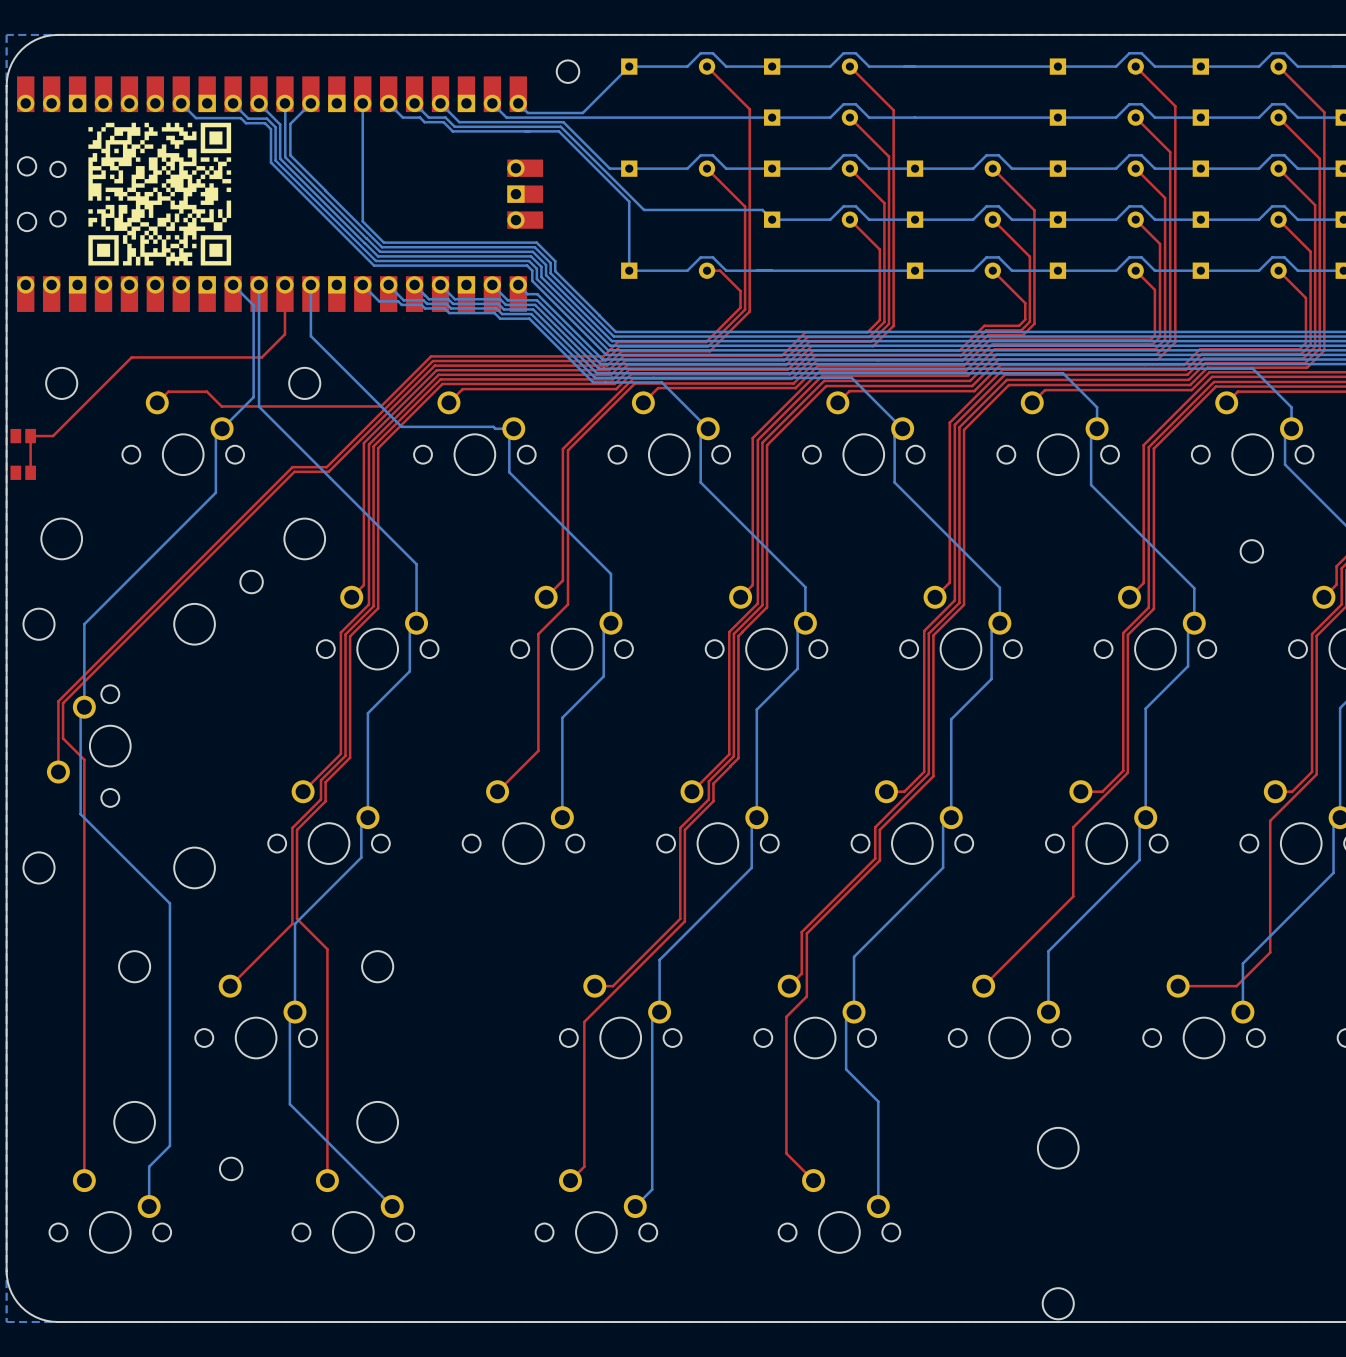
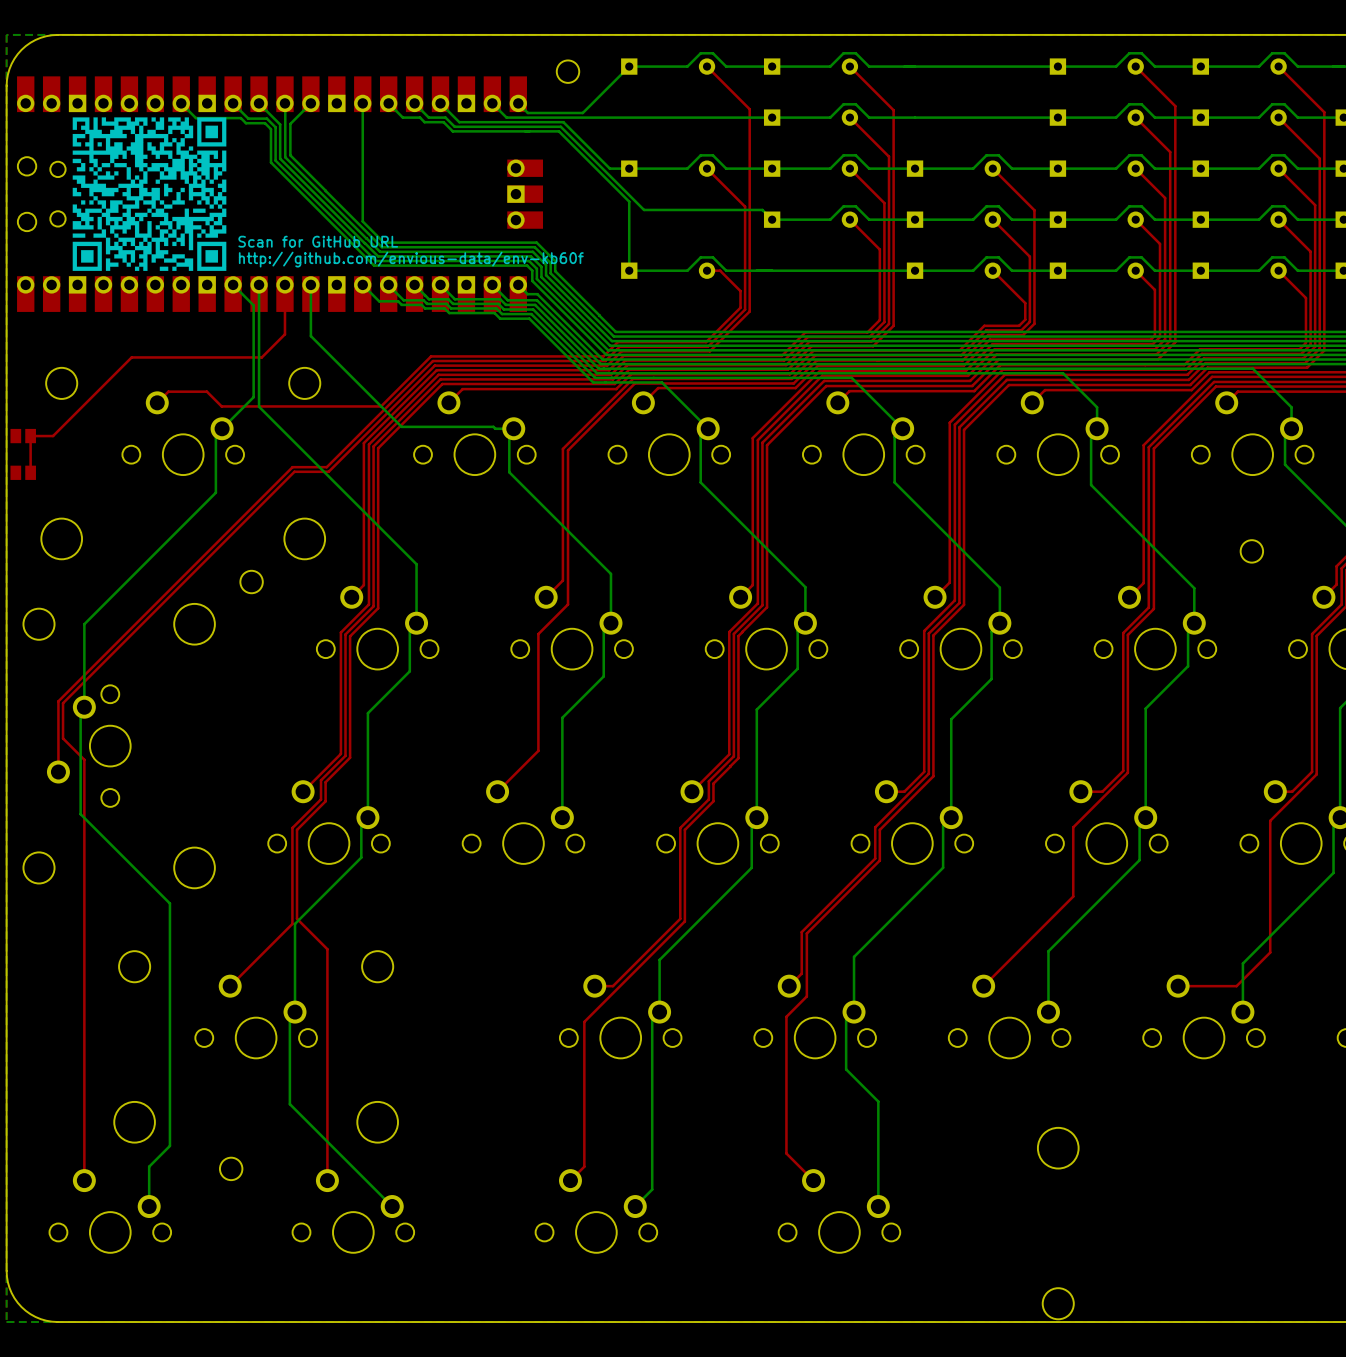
drawing shape: [88, 122, 232, 266] -> [72, 117, 227, 271]
text: none -> Scan for GitHub URL (318, 241)
text: none -> http://github.com/envious-data/env-kb60f (411, 259)

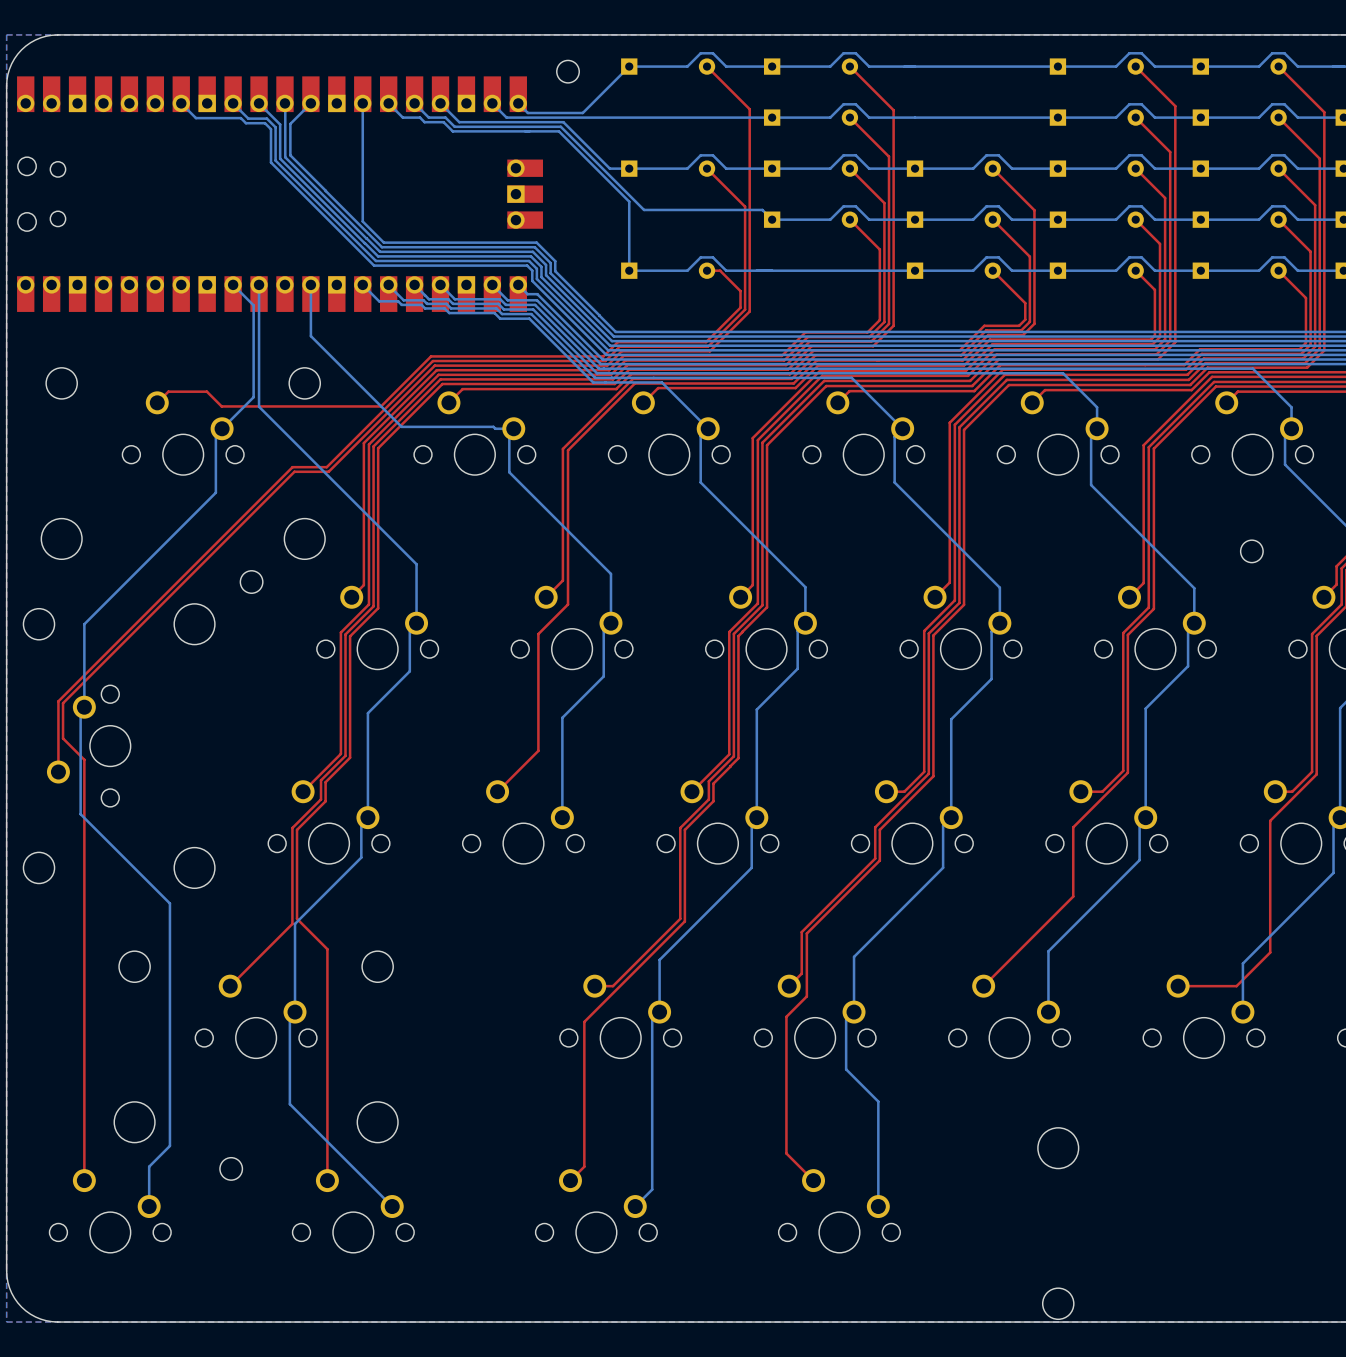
drawing: [72, 117, 227, 271] -> none
text: Scan for GitHub URL (318, 241) -> none
text: http://github.com/envious-data/env-kb60f (411, 259) -> none
top track: (284, 284) (284, 334) (261, 357) (131, 357) (53, 436) (30, 436) (30, 472) -> none
part: (23, 454) -> none

